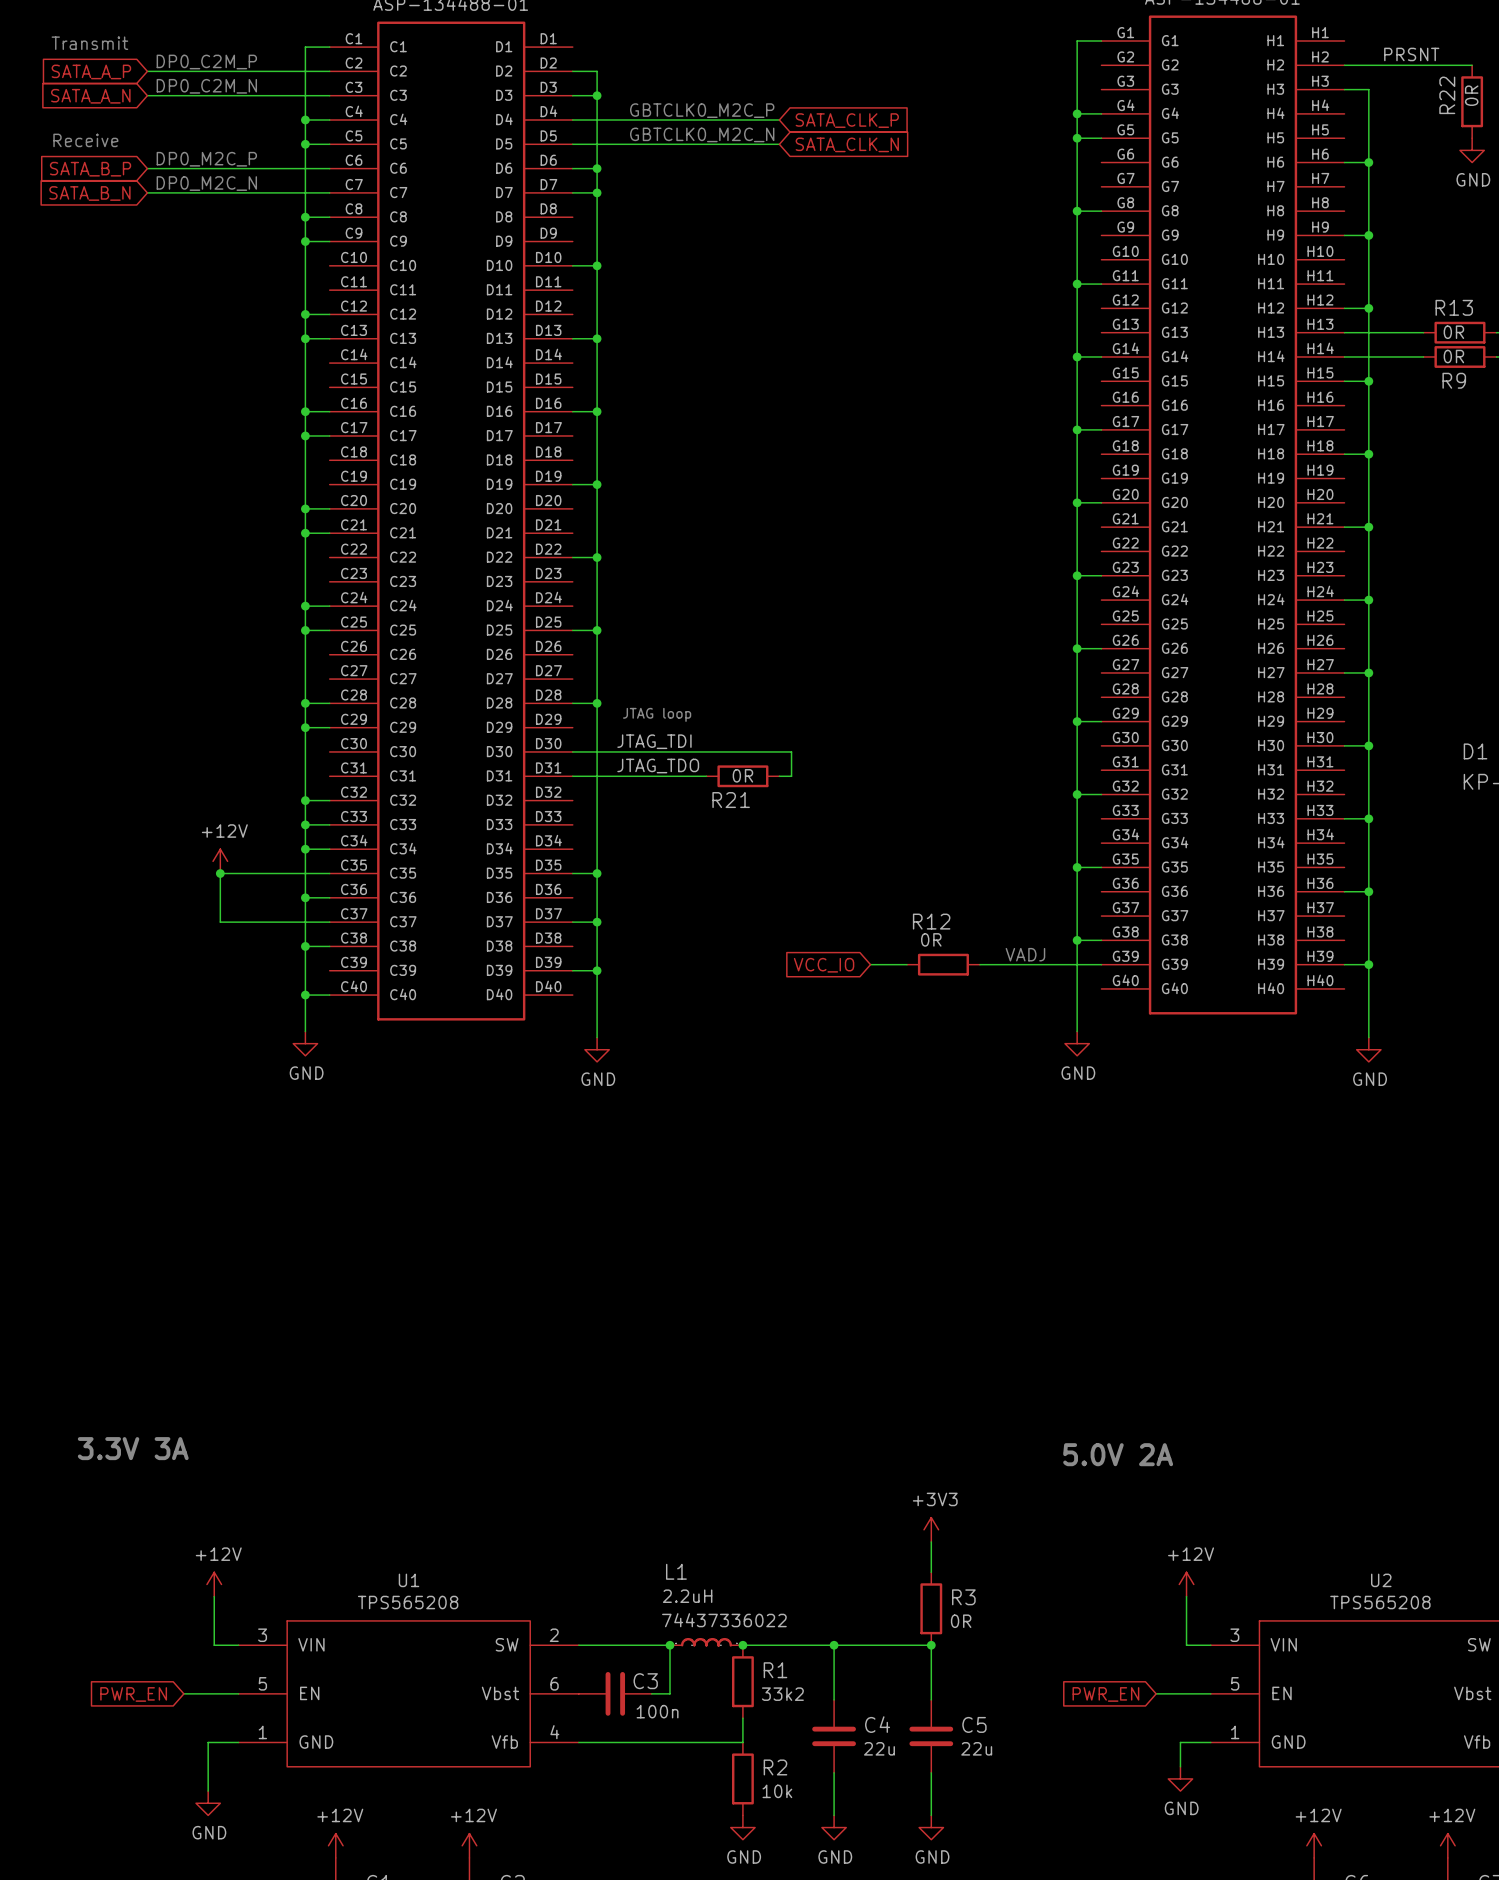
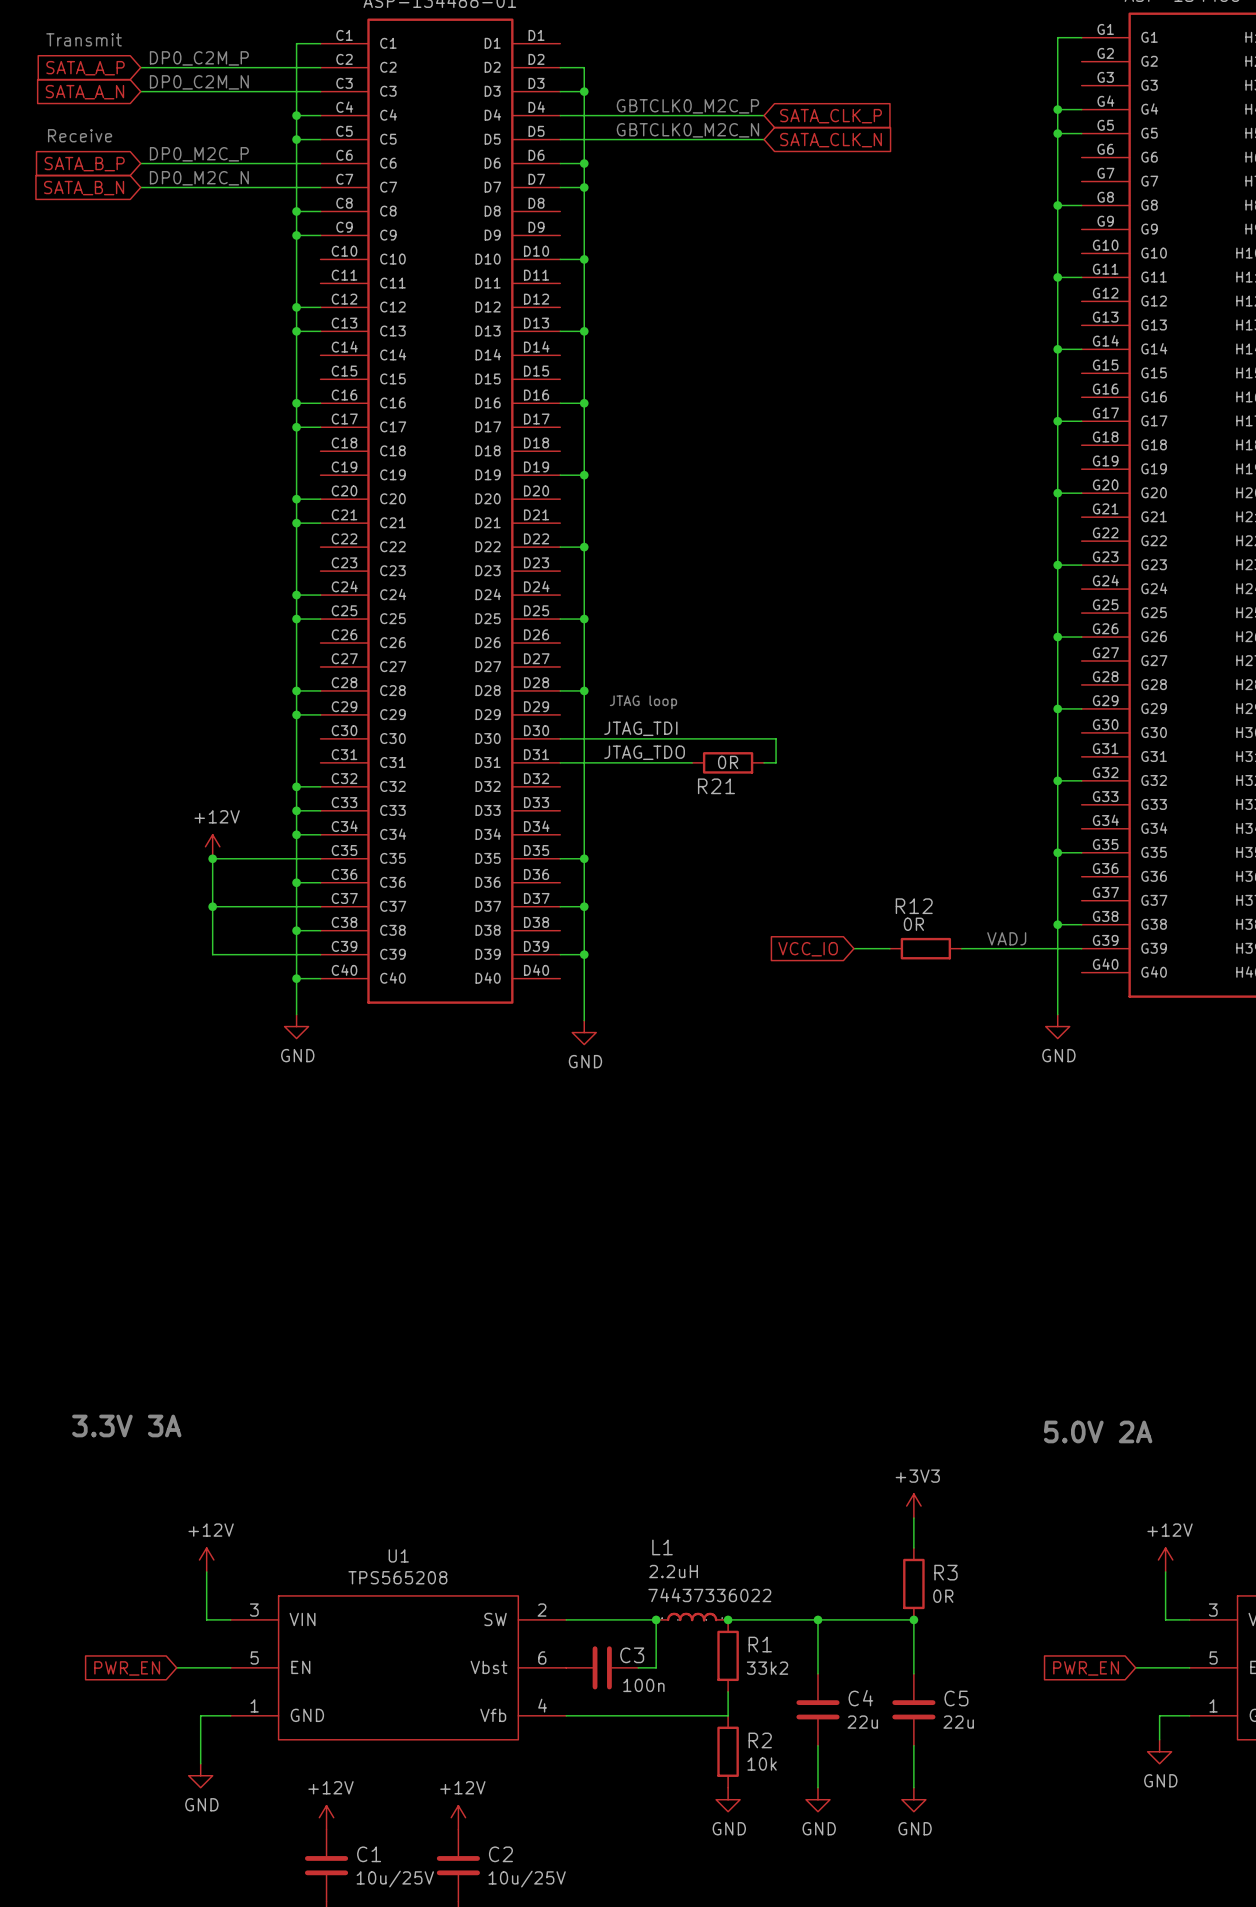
wire: none -> (212, 906) (212, 954) (320, 954)
junction: none -> (212, 906)

